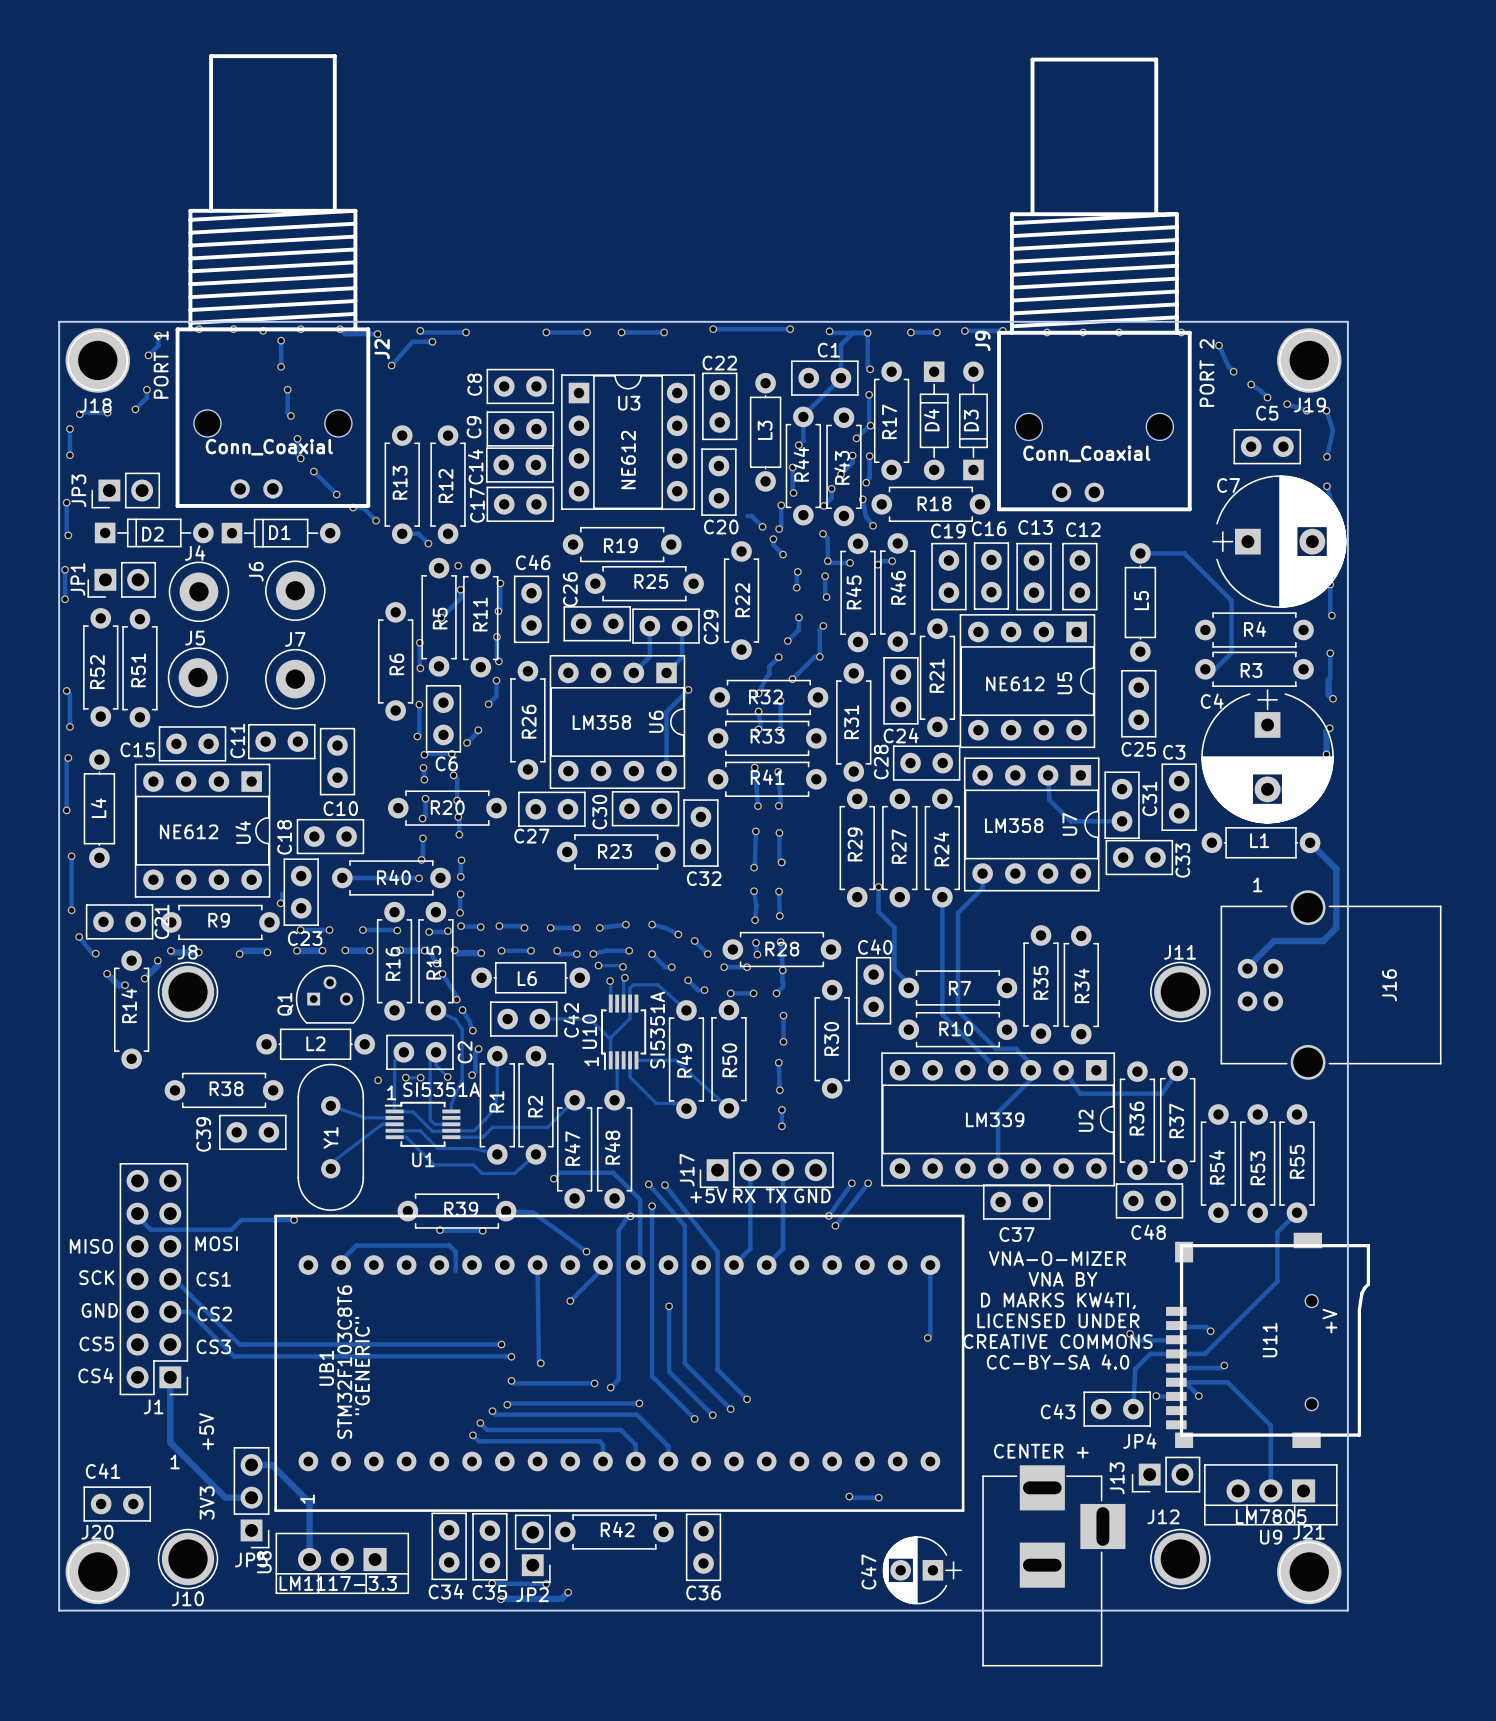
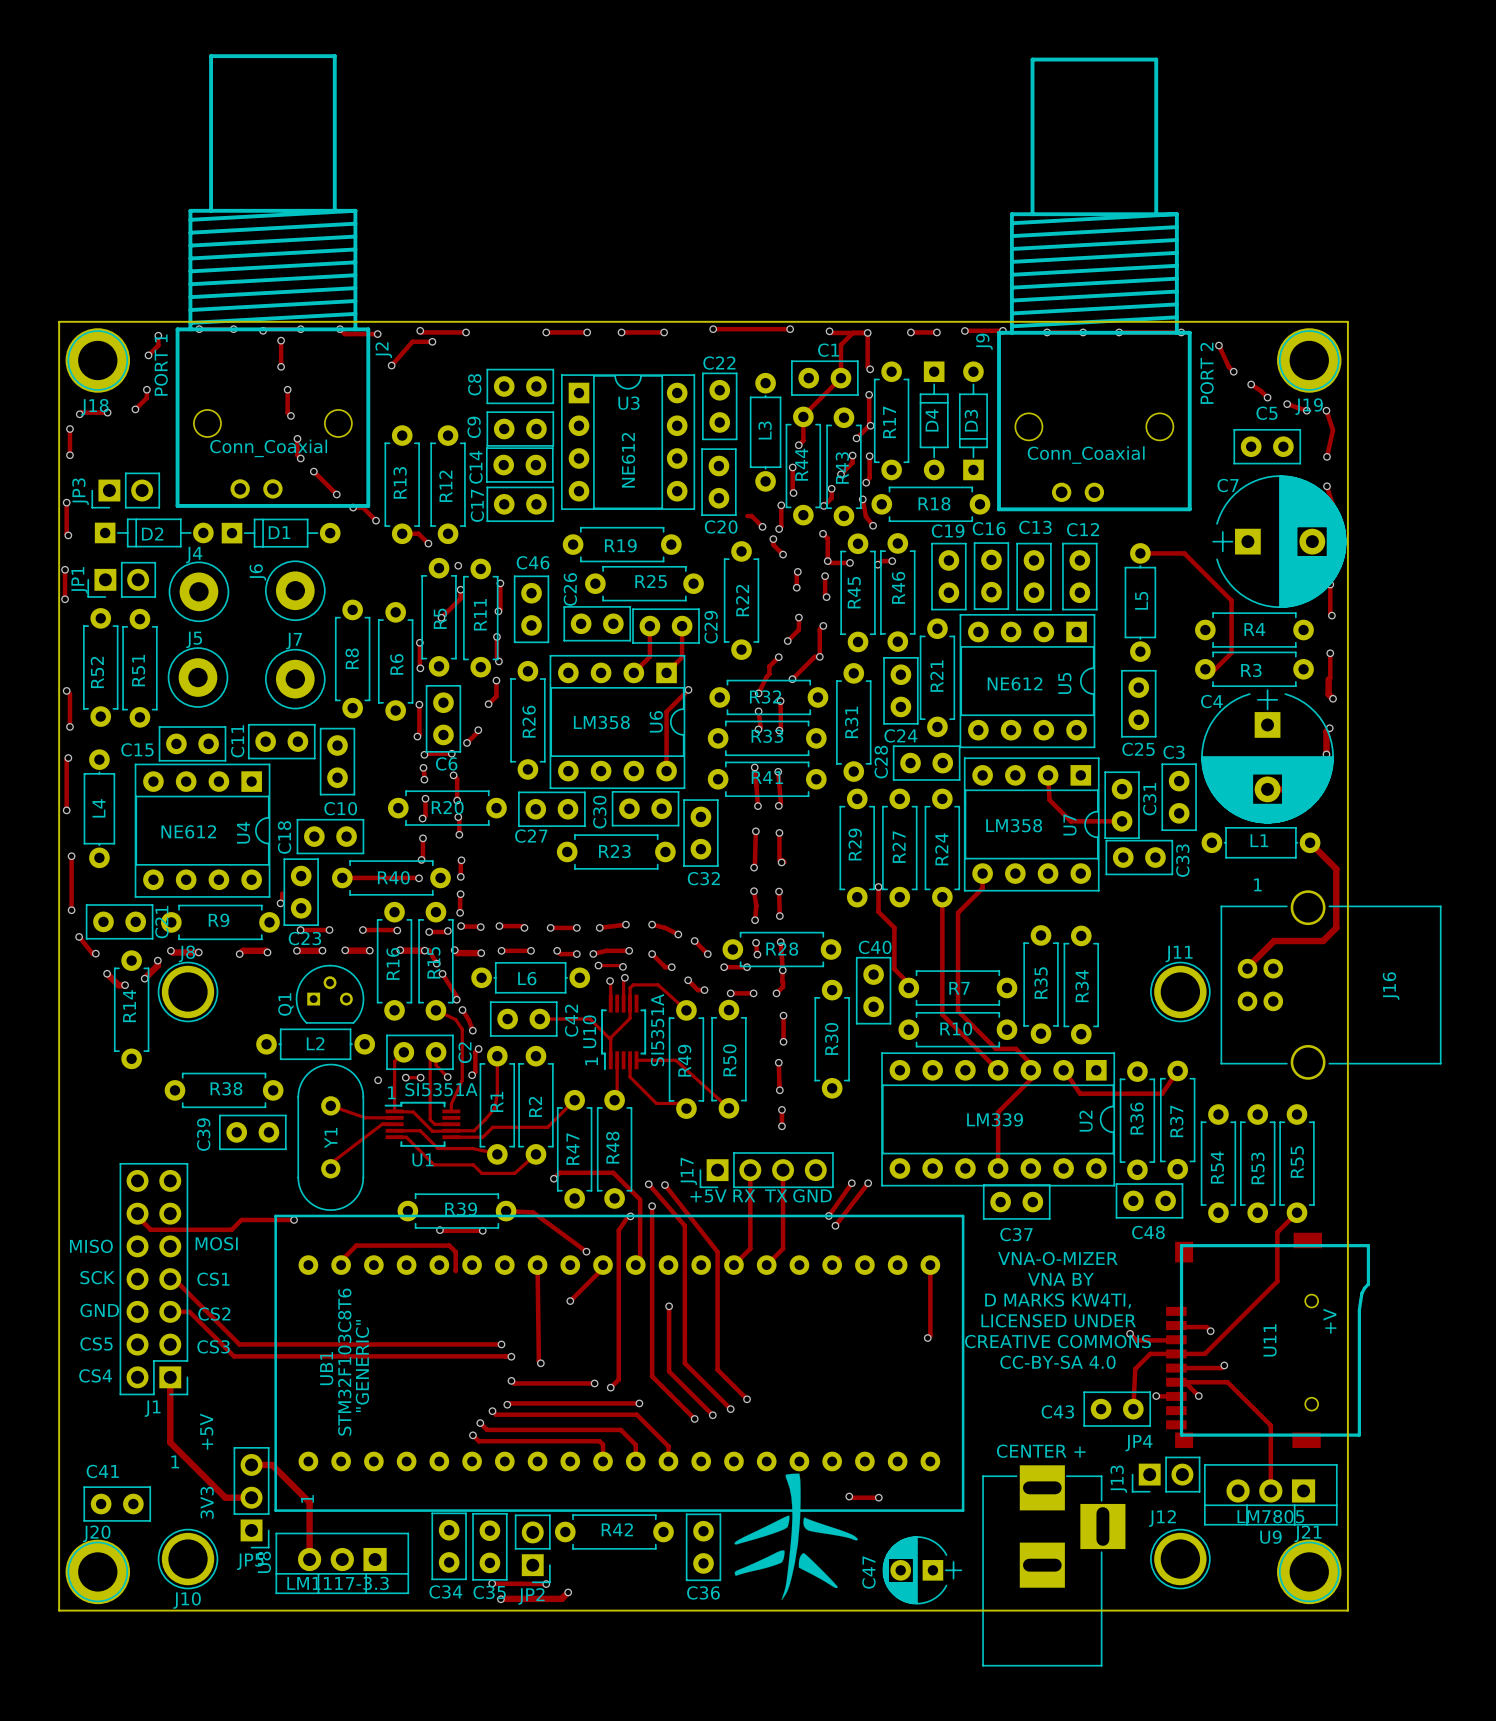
R8: none -> (352, 659)
drawing: none -> [734, 1473, 859, 1601]

